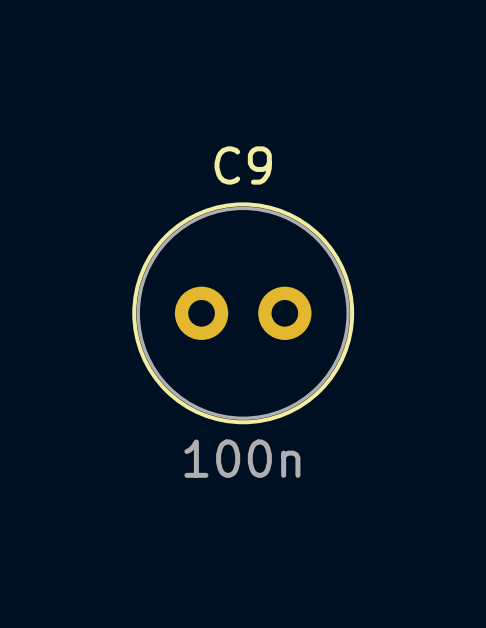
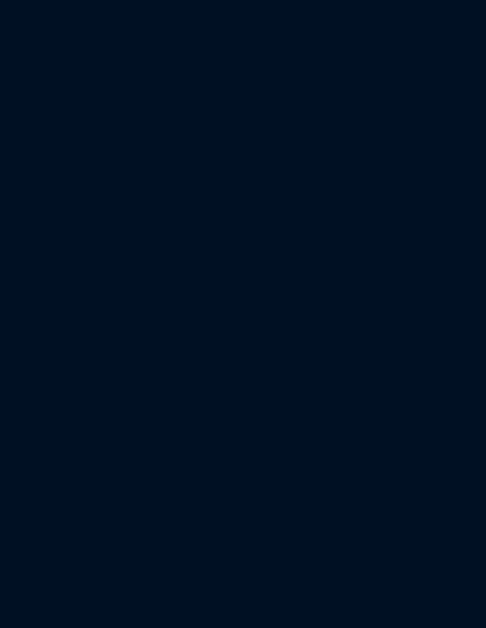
C9: 100n (243, 313) -> none

